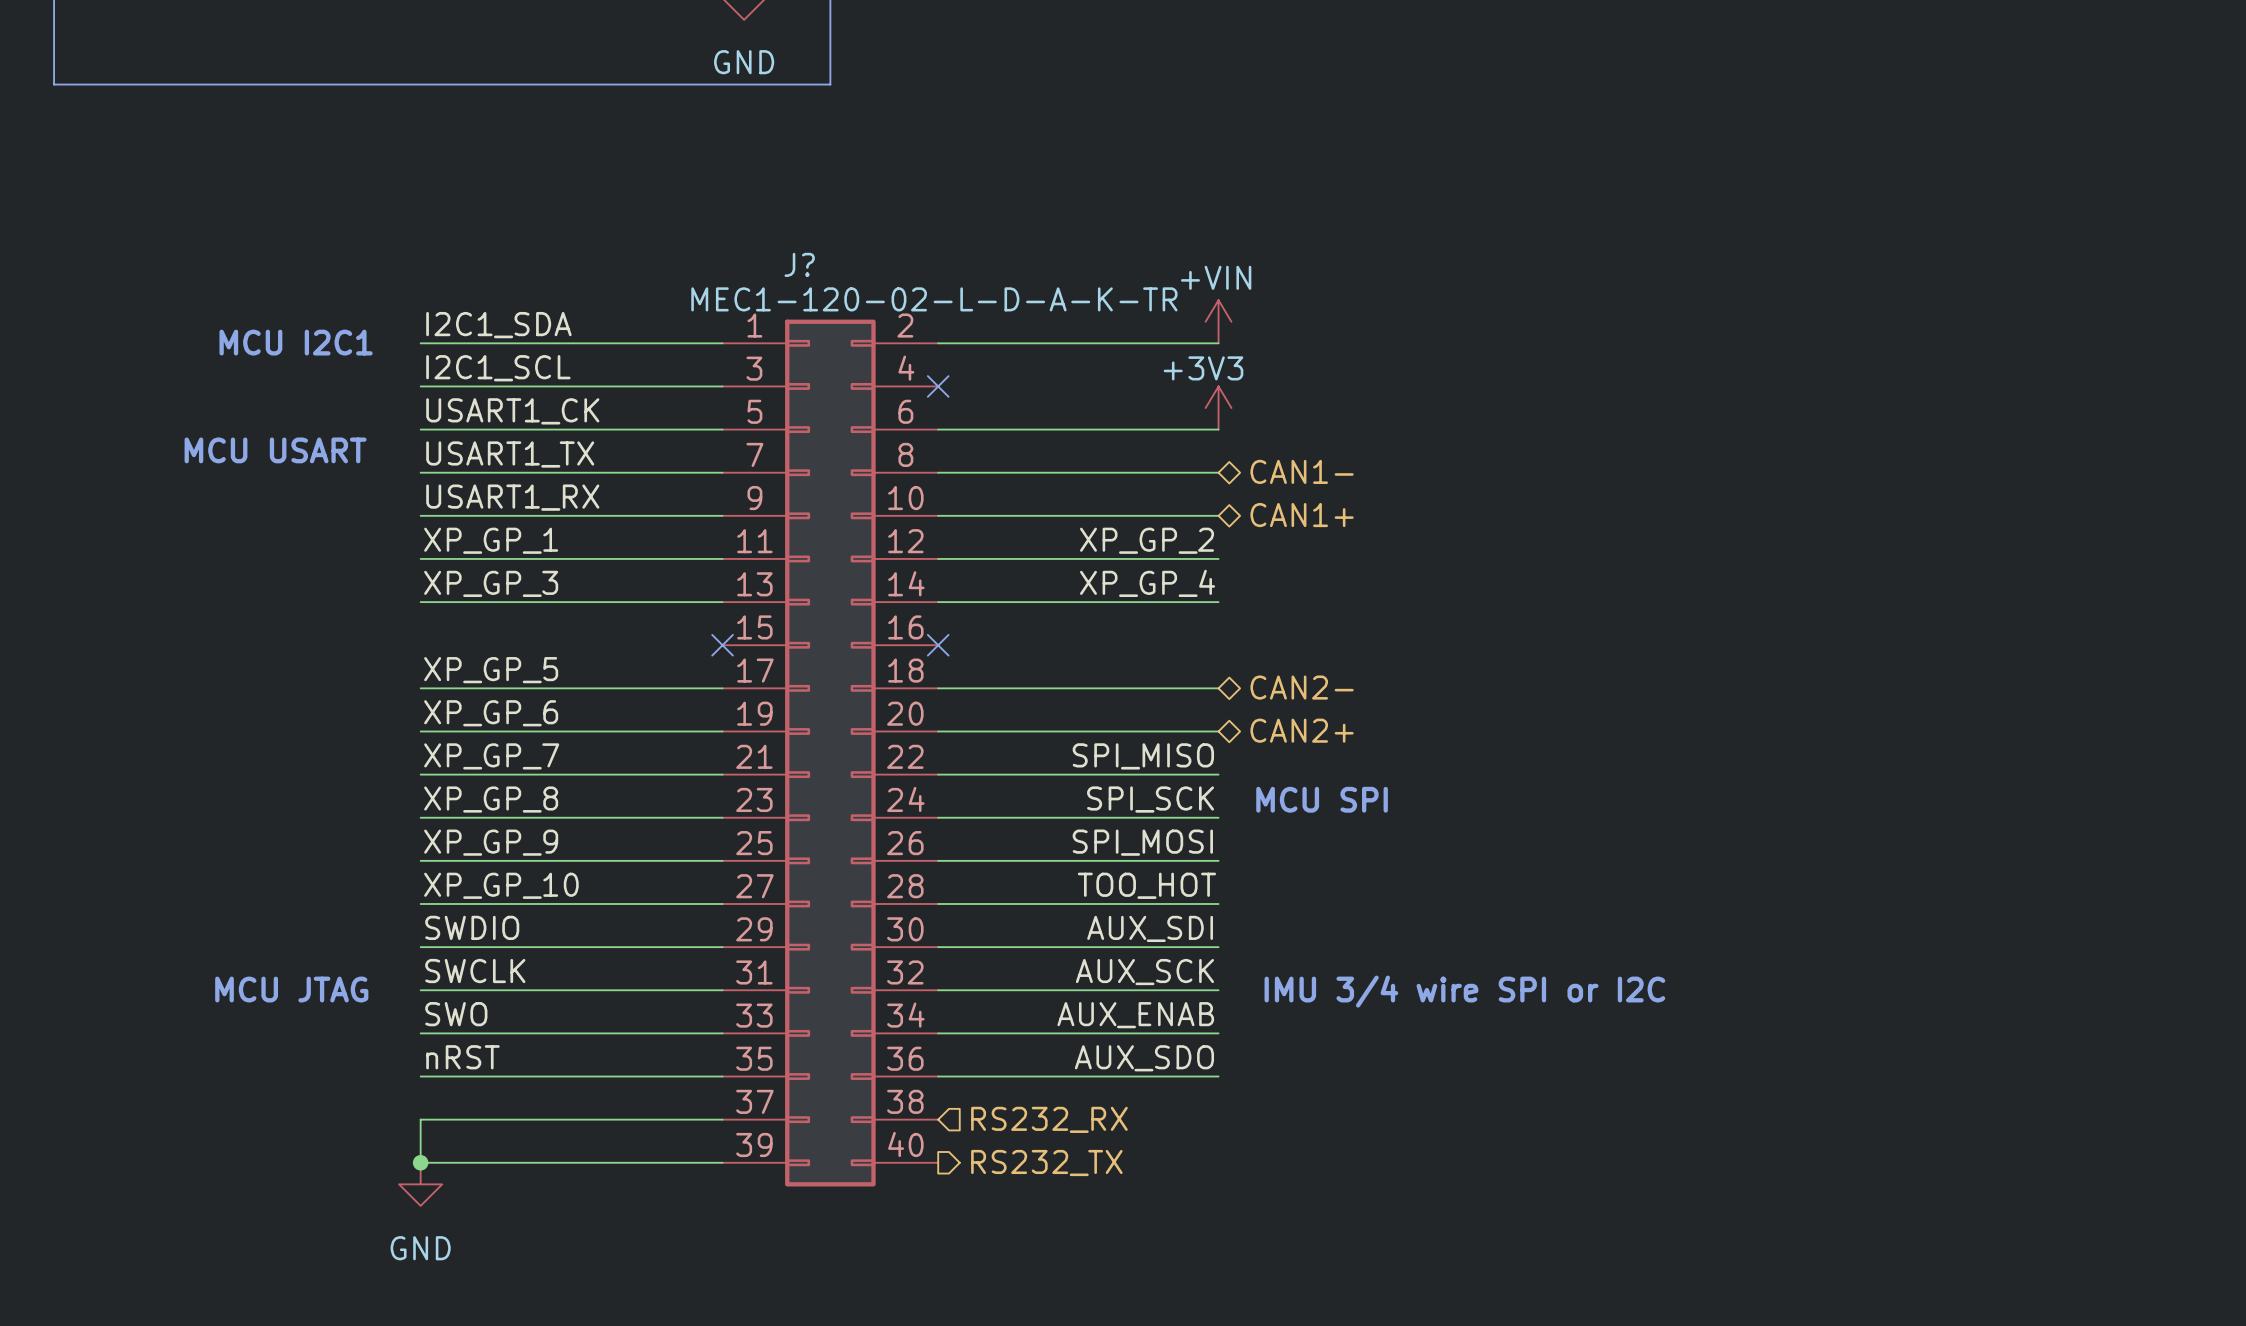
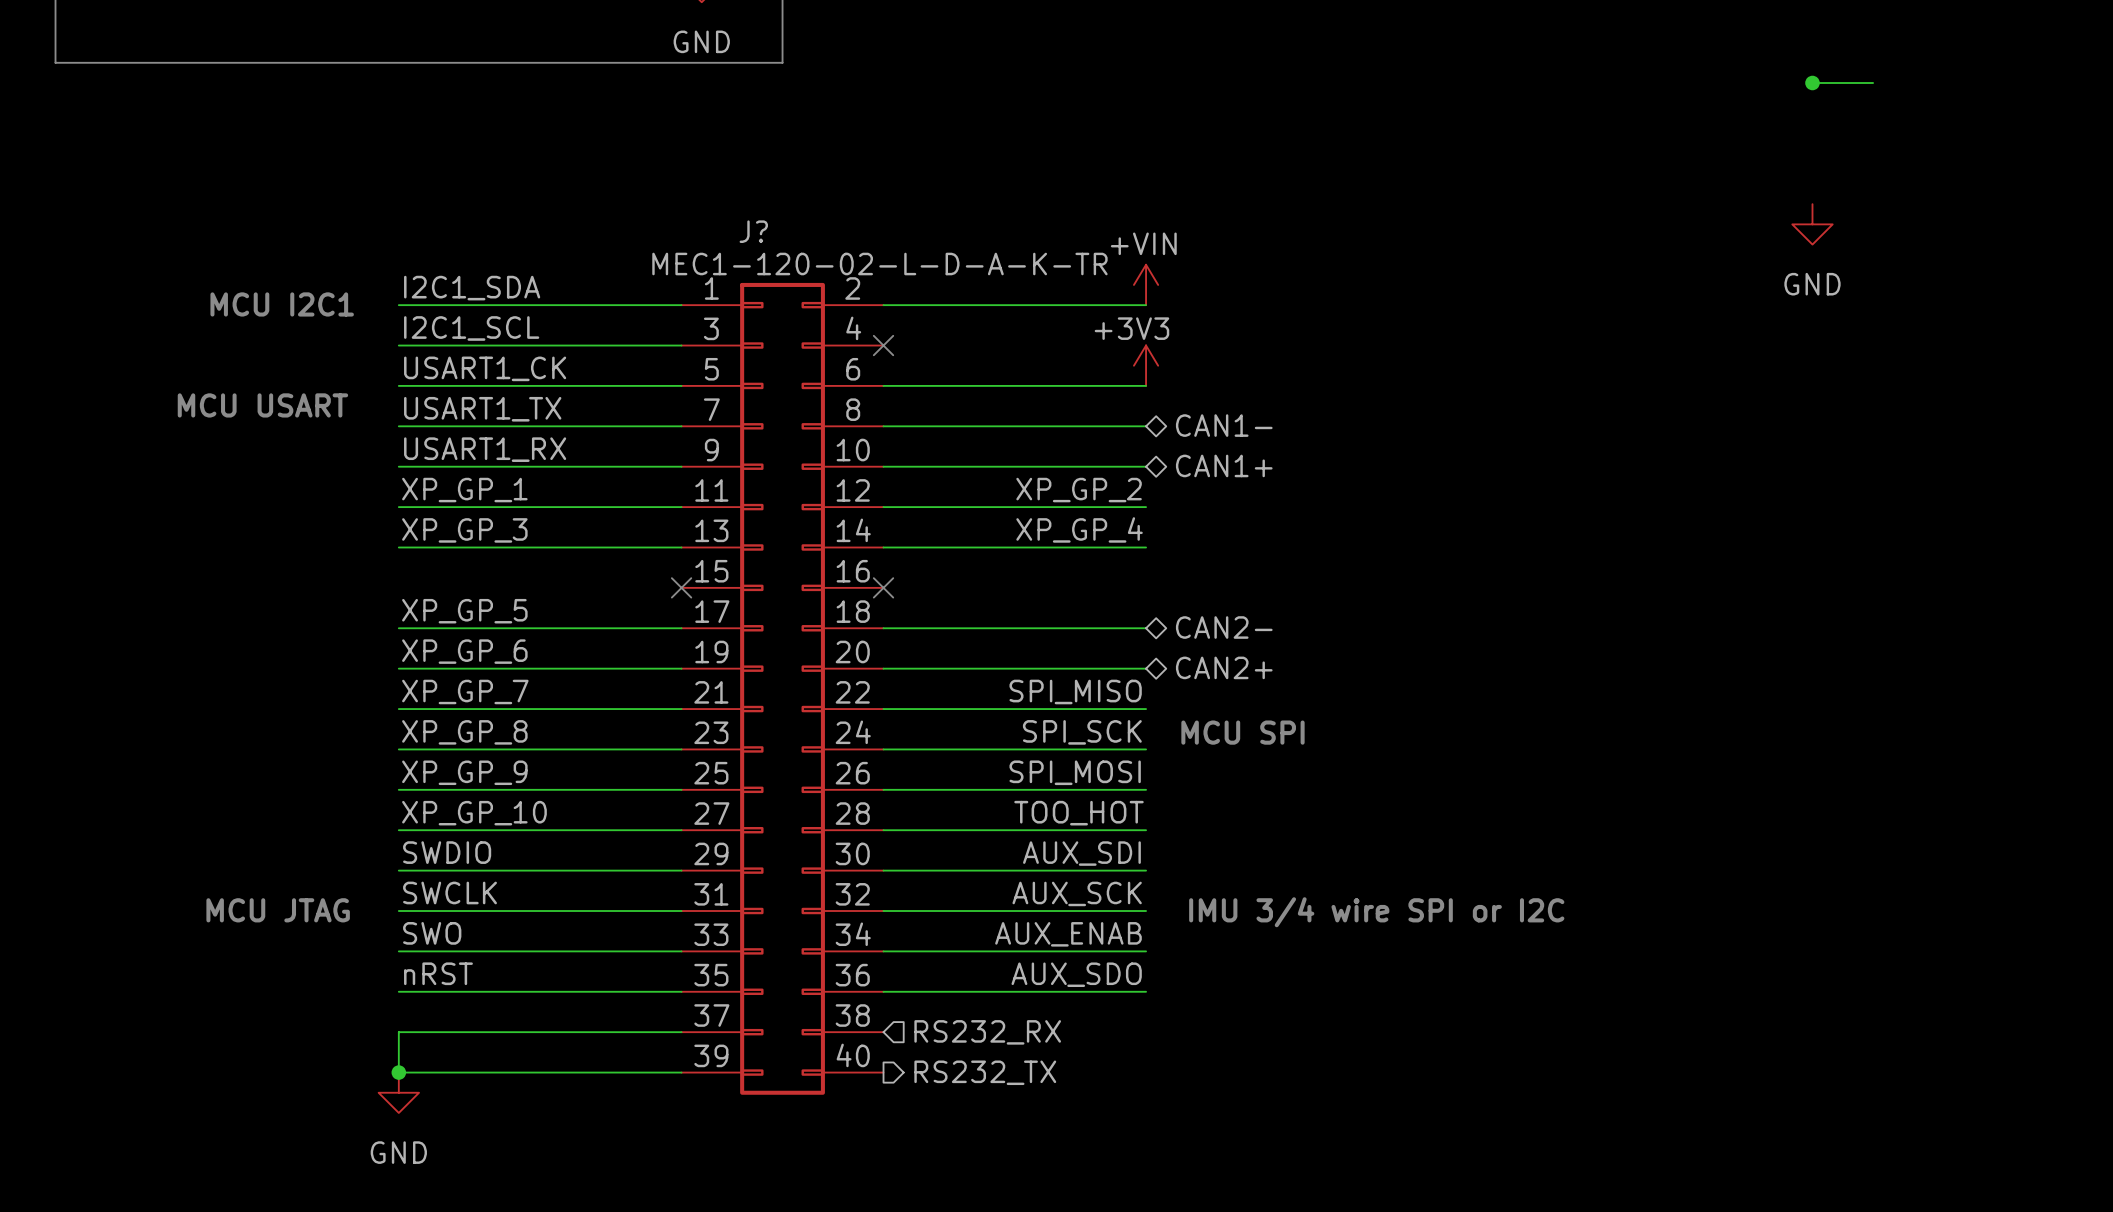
wire: none -> (1812, 83) (1873, 83)
junction: none -> (1812, 83)
power symbol: none -> GND (1812, 224)

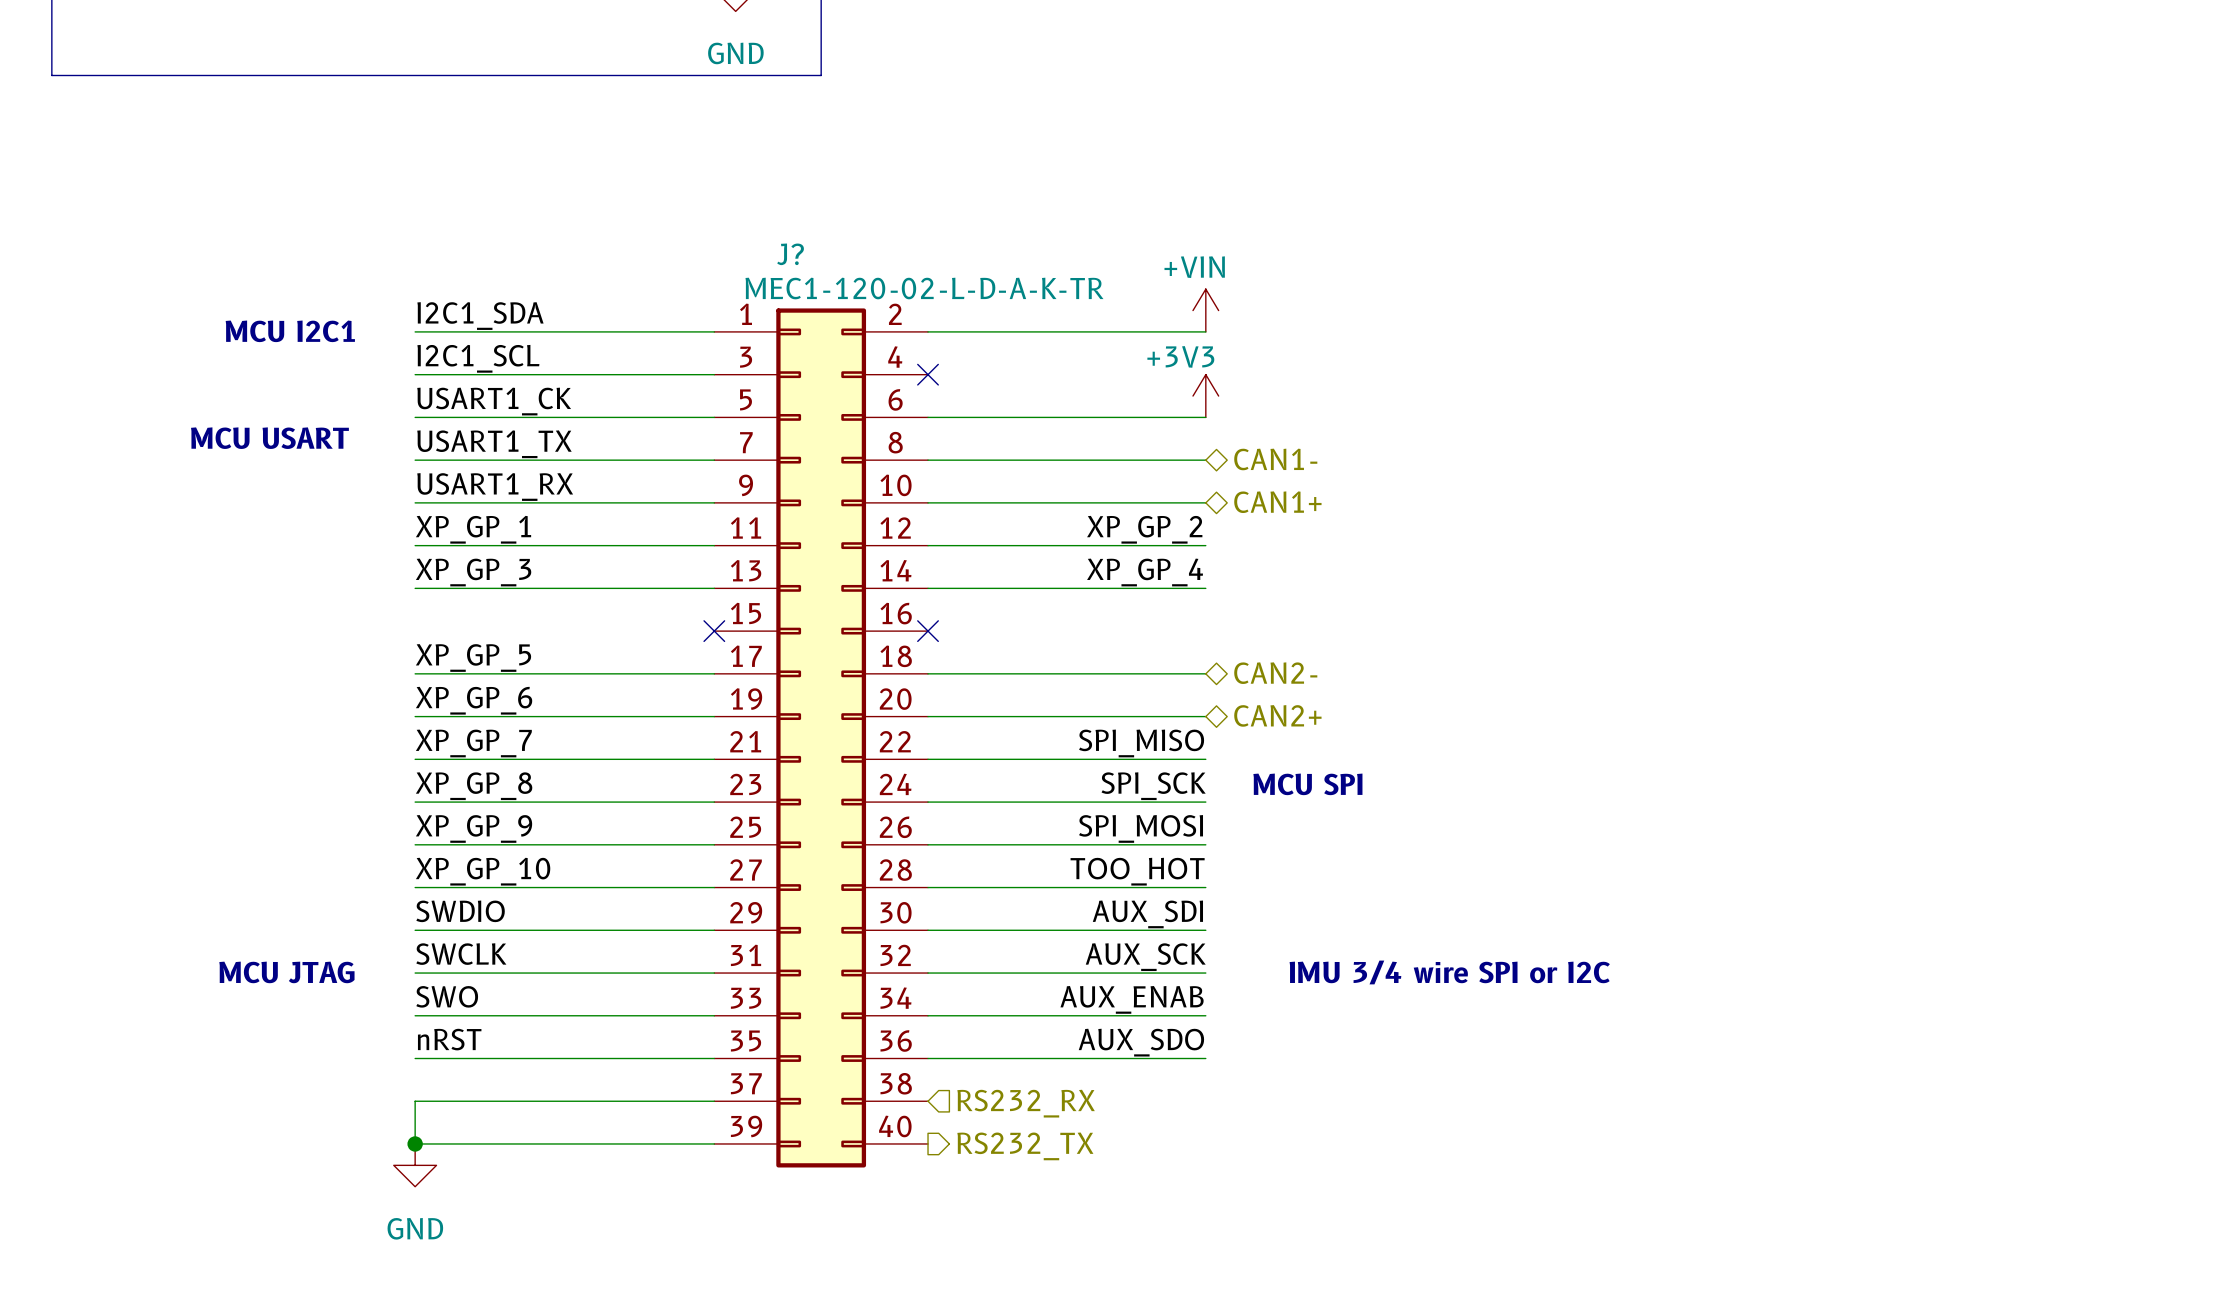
wire: (1812, 83) (1873, 83) -> none
junction: (1812, 83) -> none
power symbol: GND (1812, 224) -> none

